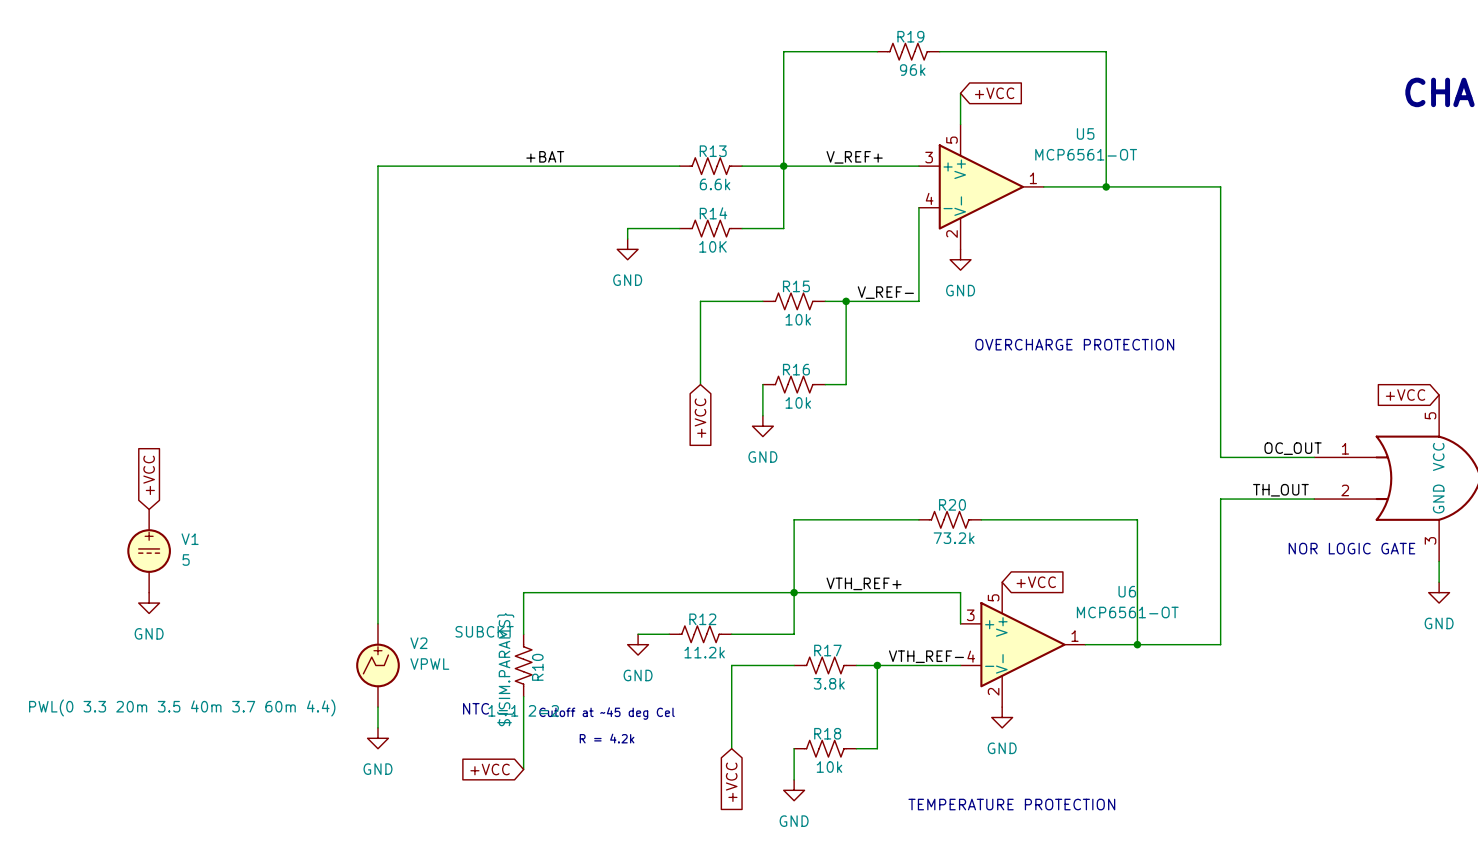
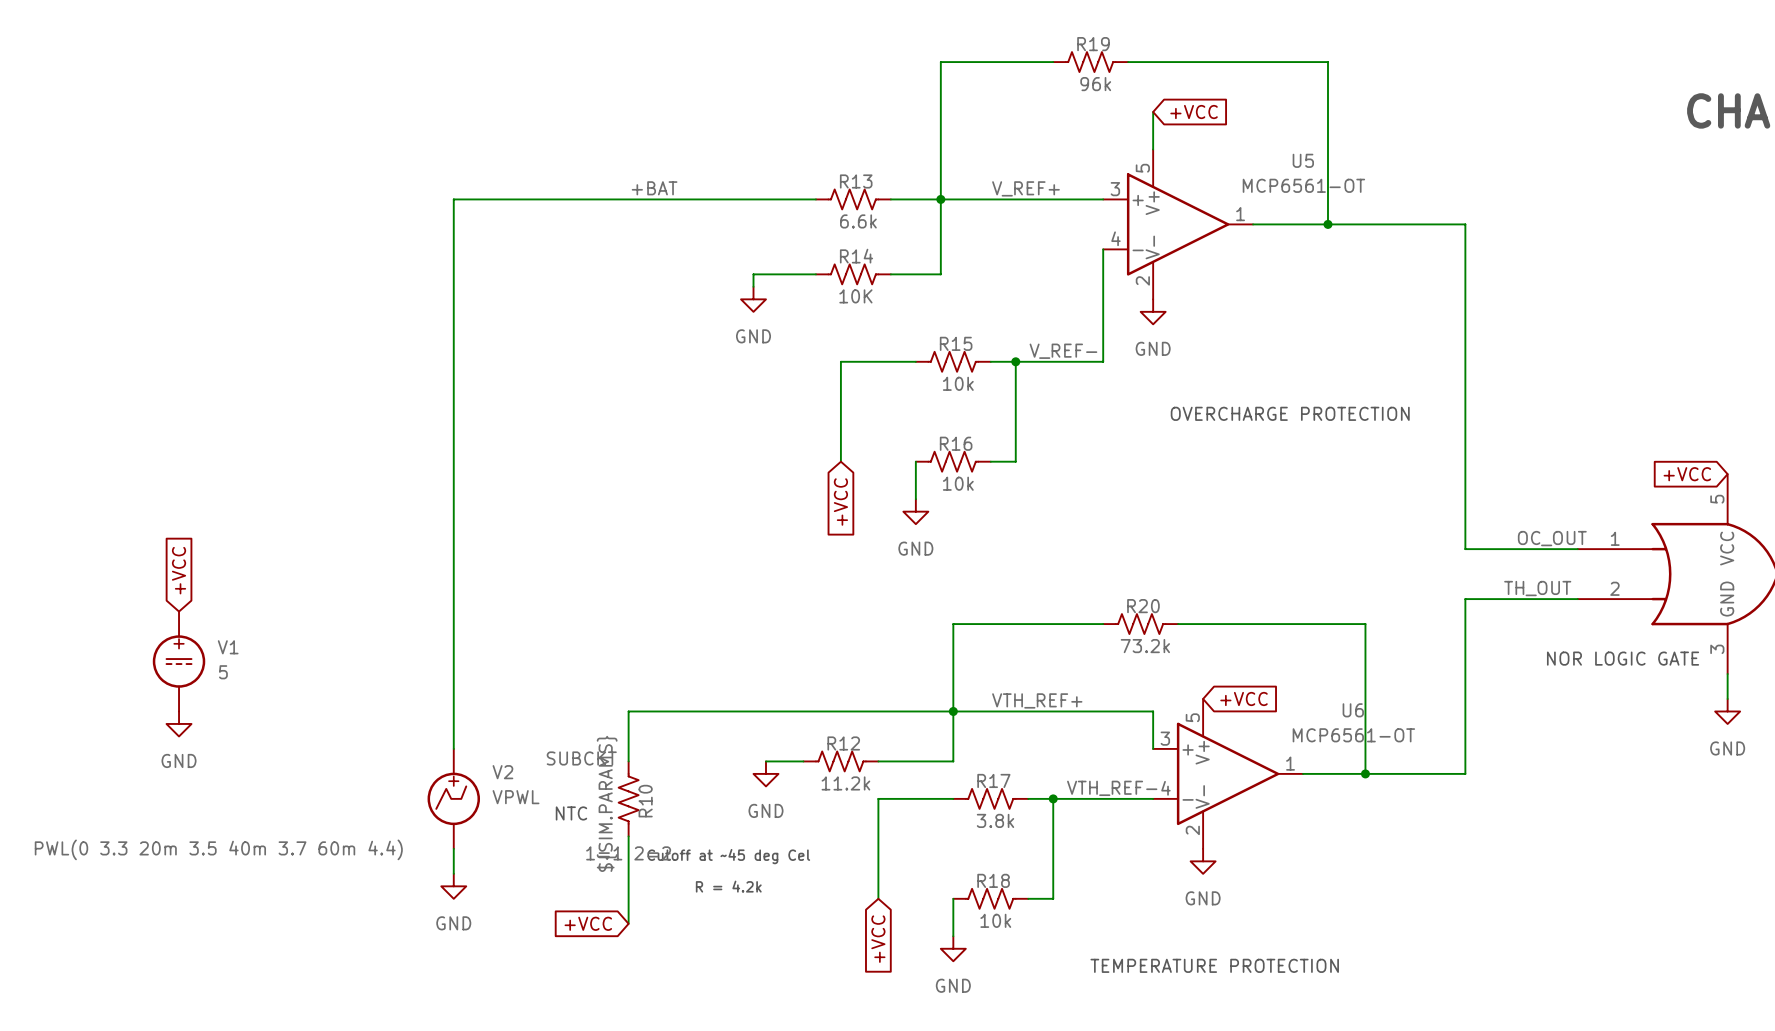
text position: NTC (476, 708) -> NTC (571, 813)

